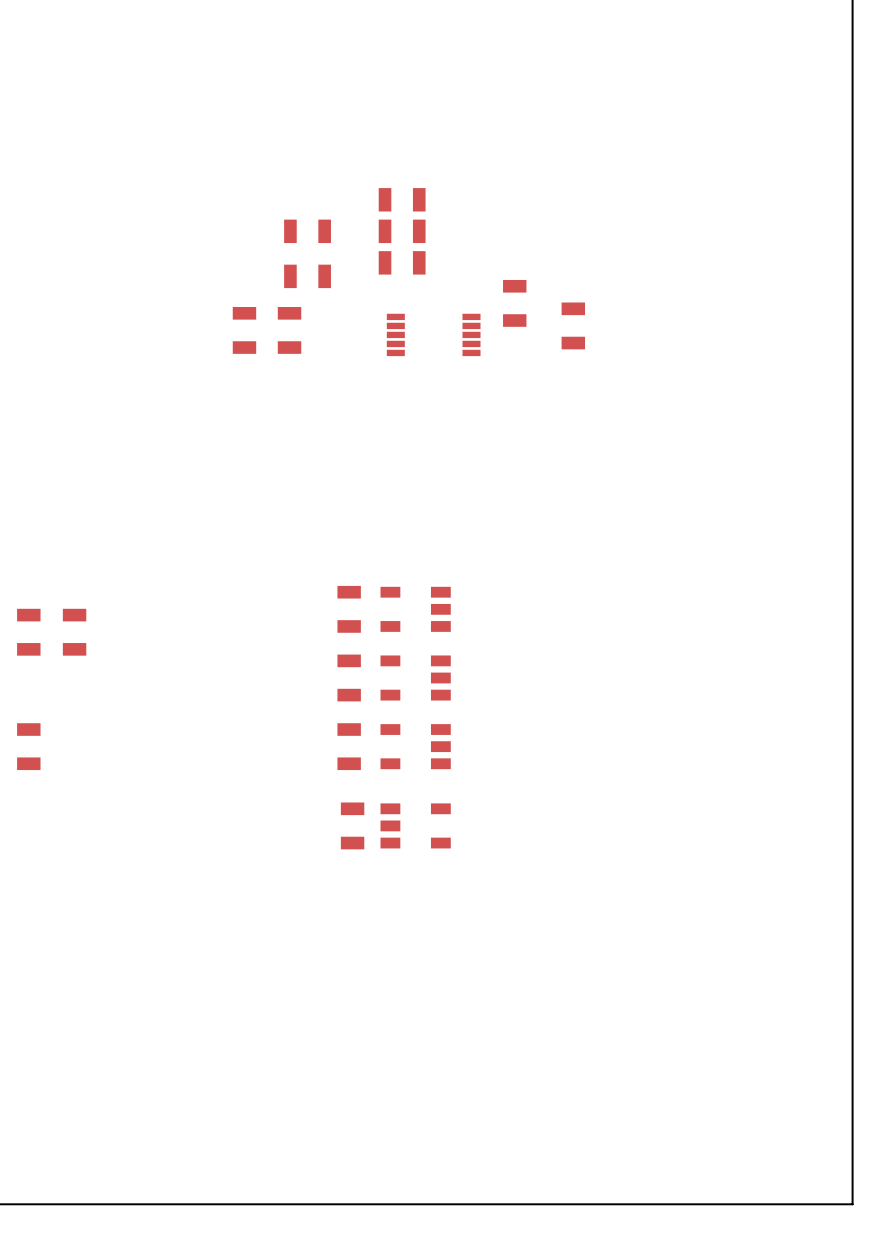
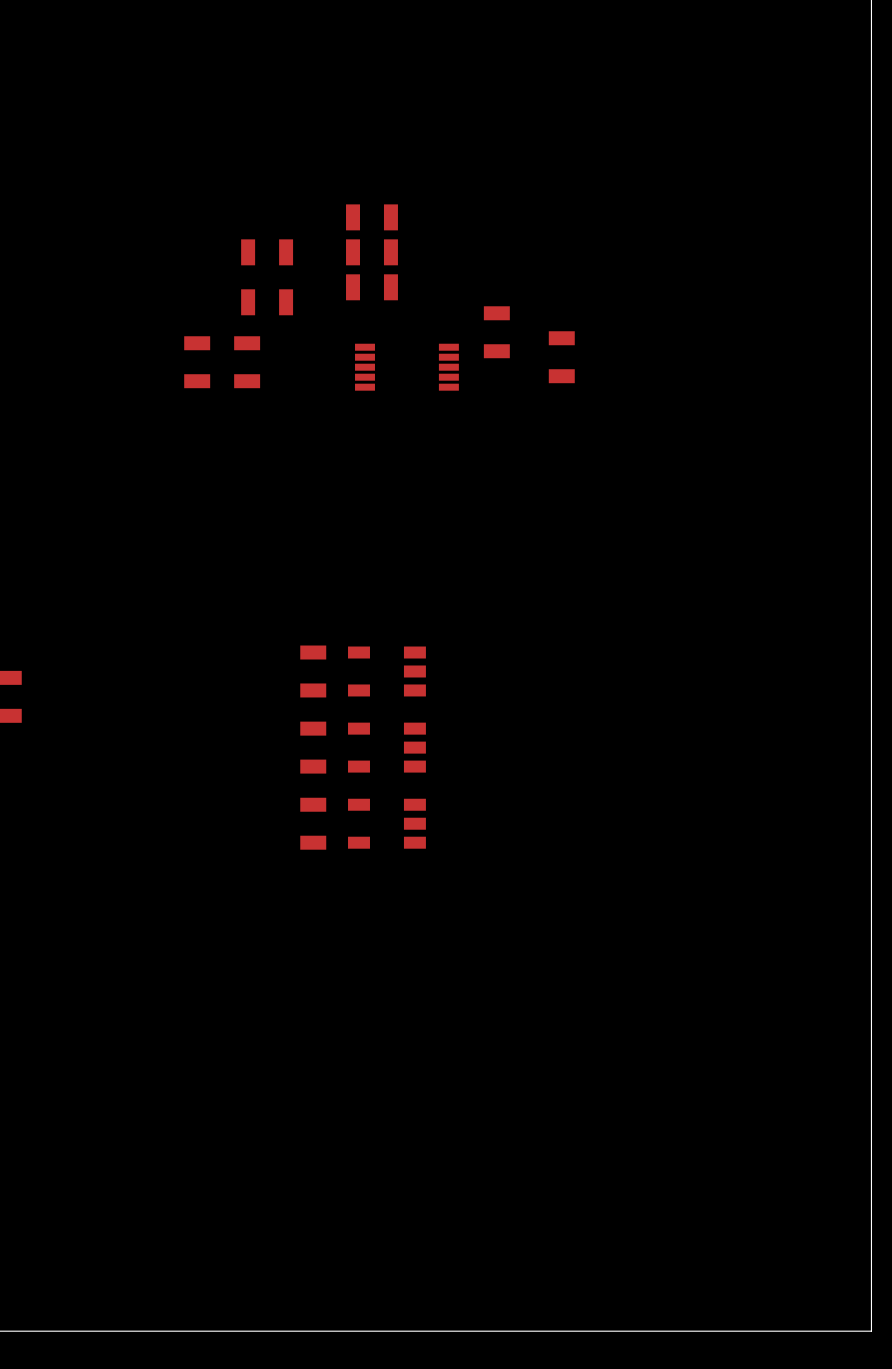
part: (352, 825) -> none
part: (415, 825) -> none

